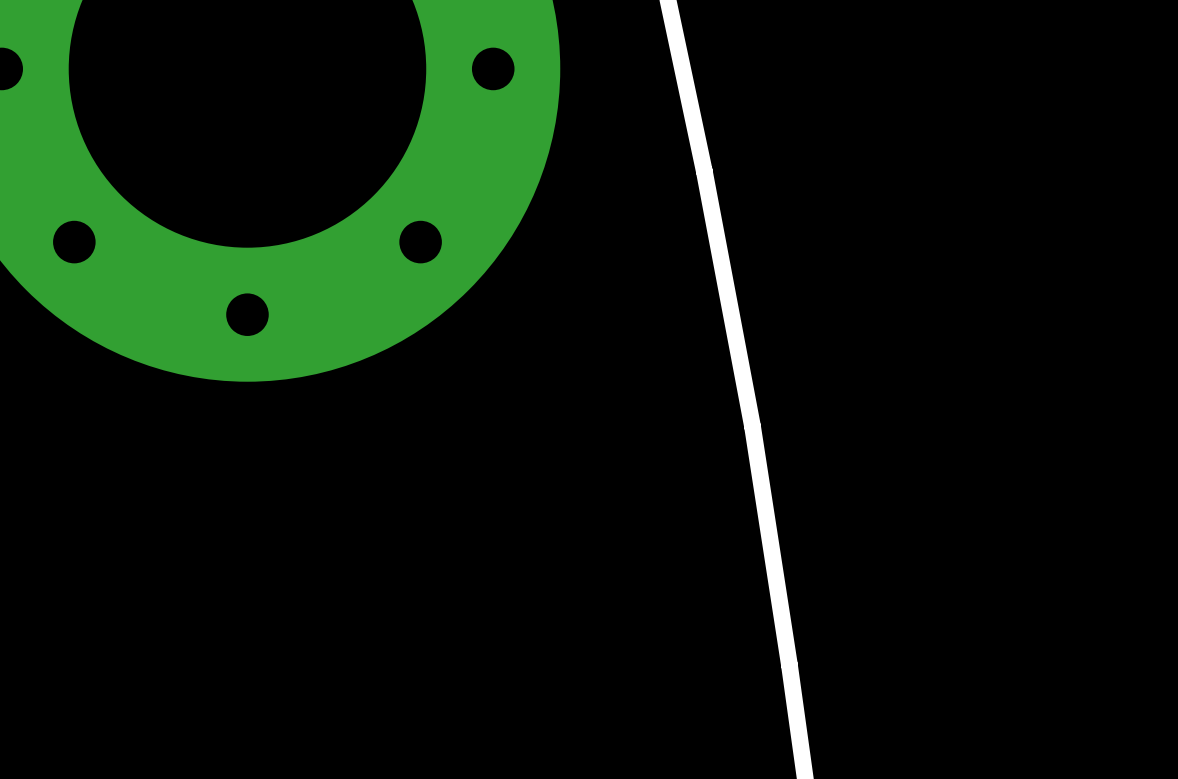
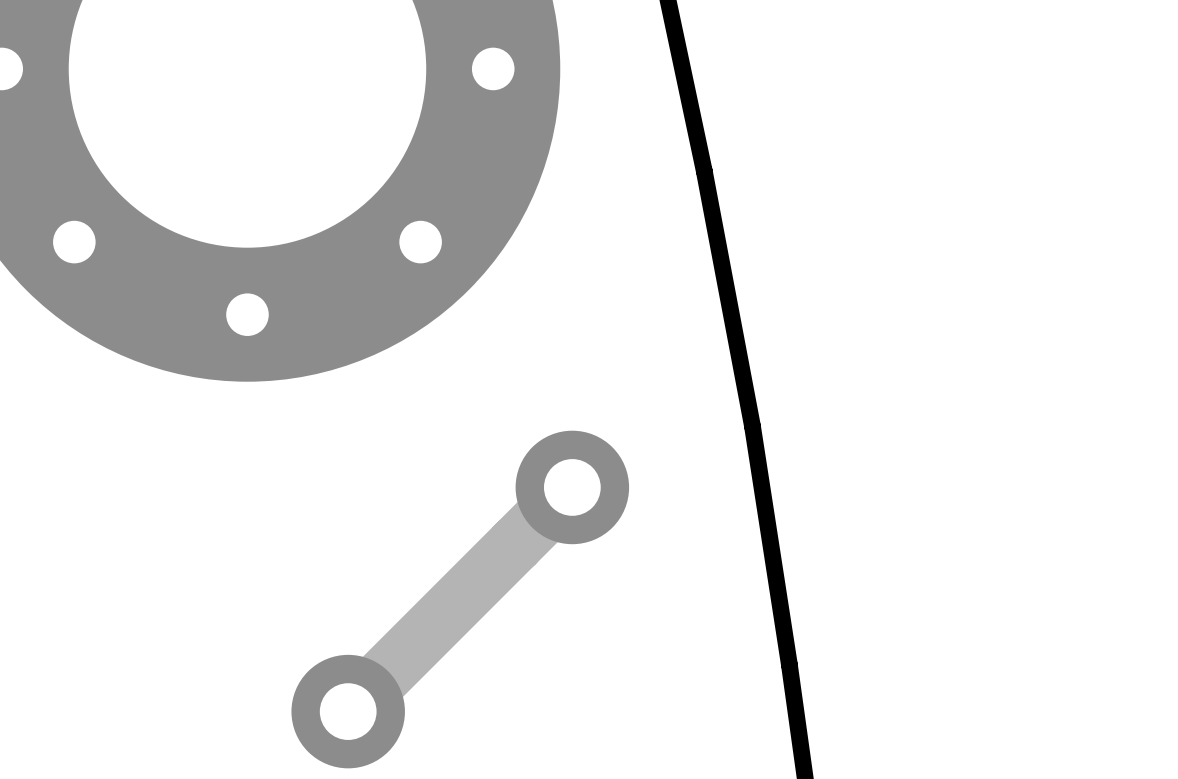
track: none -> (572, 487) (348, 711)
via: none -> (572, 487)
via: none -> (348, 711)

